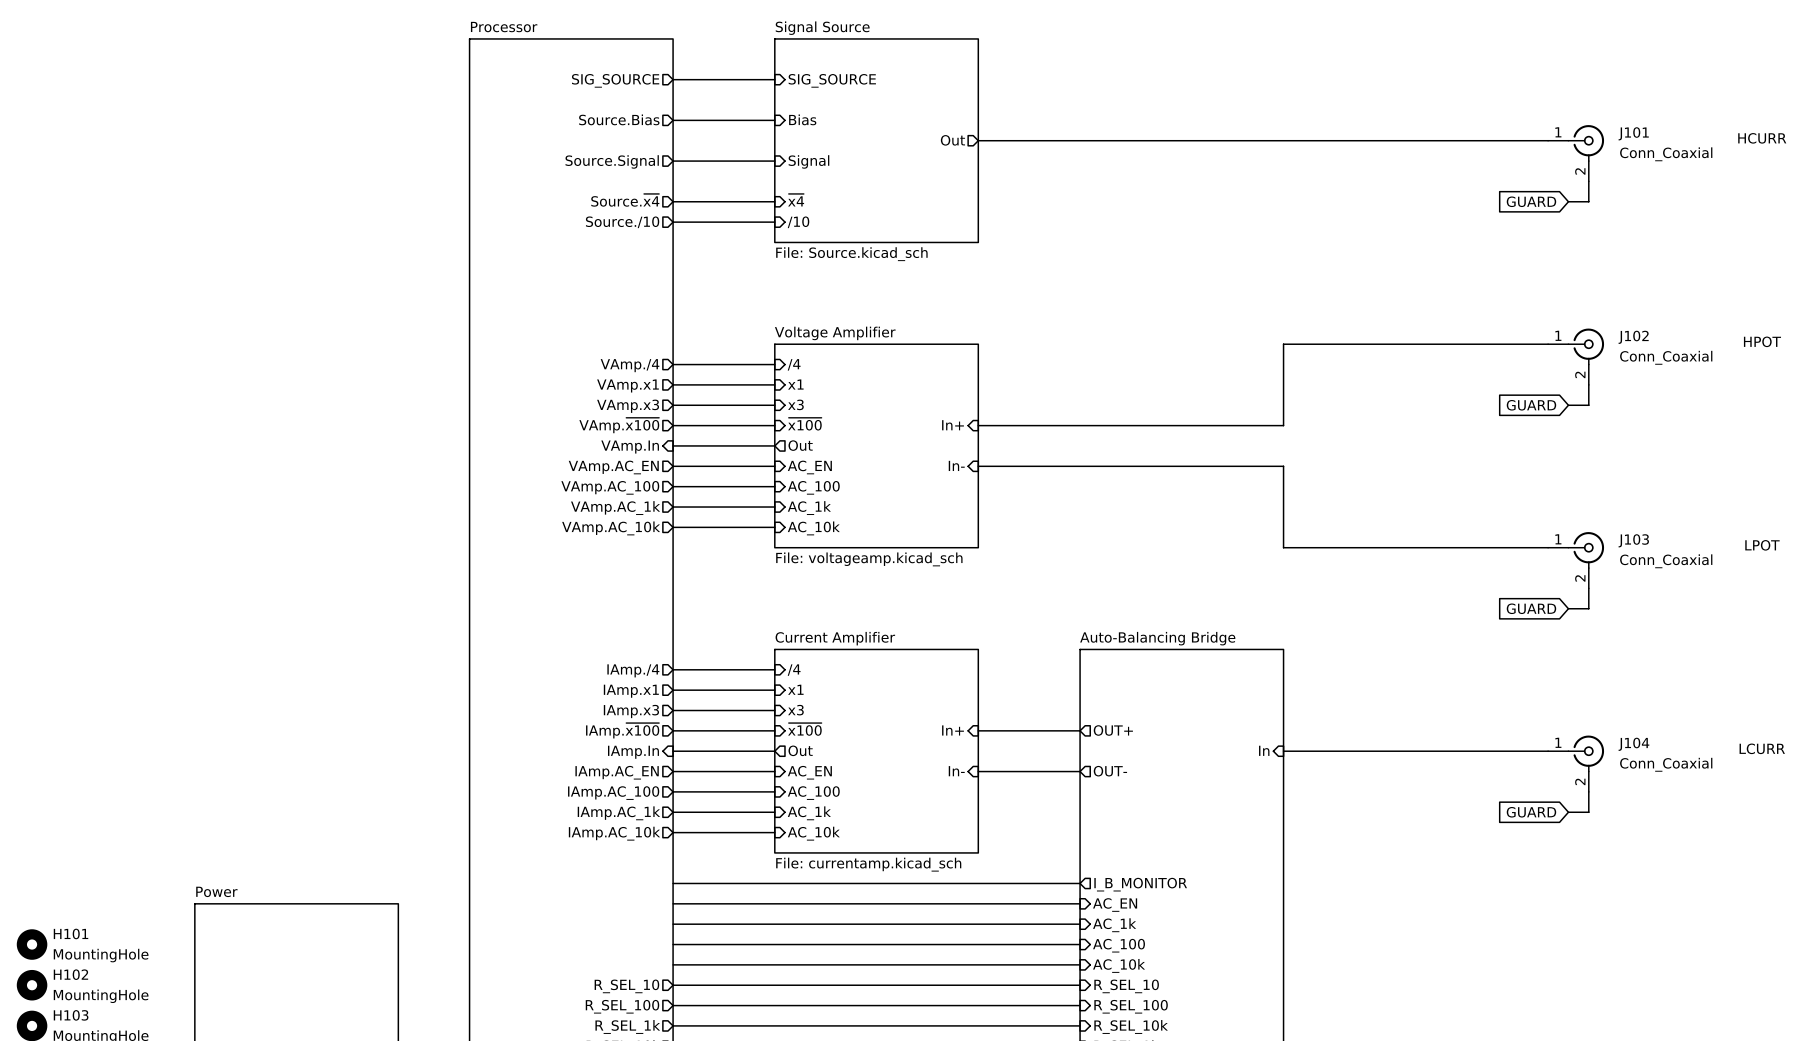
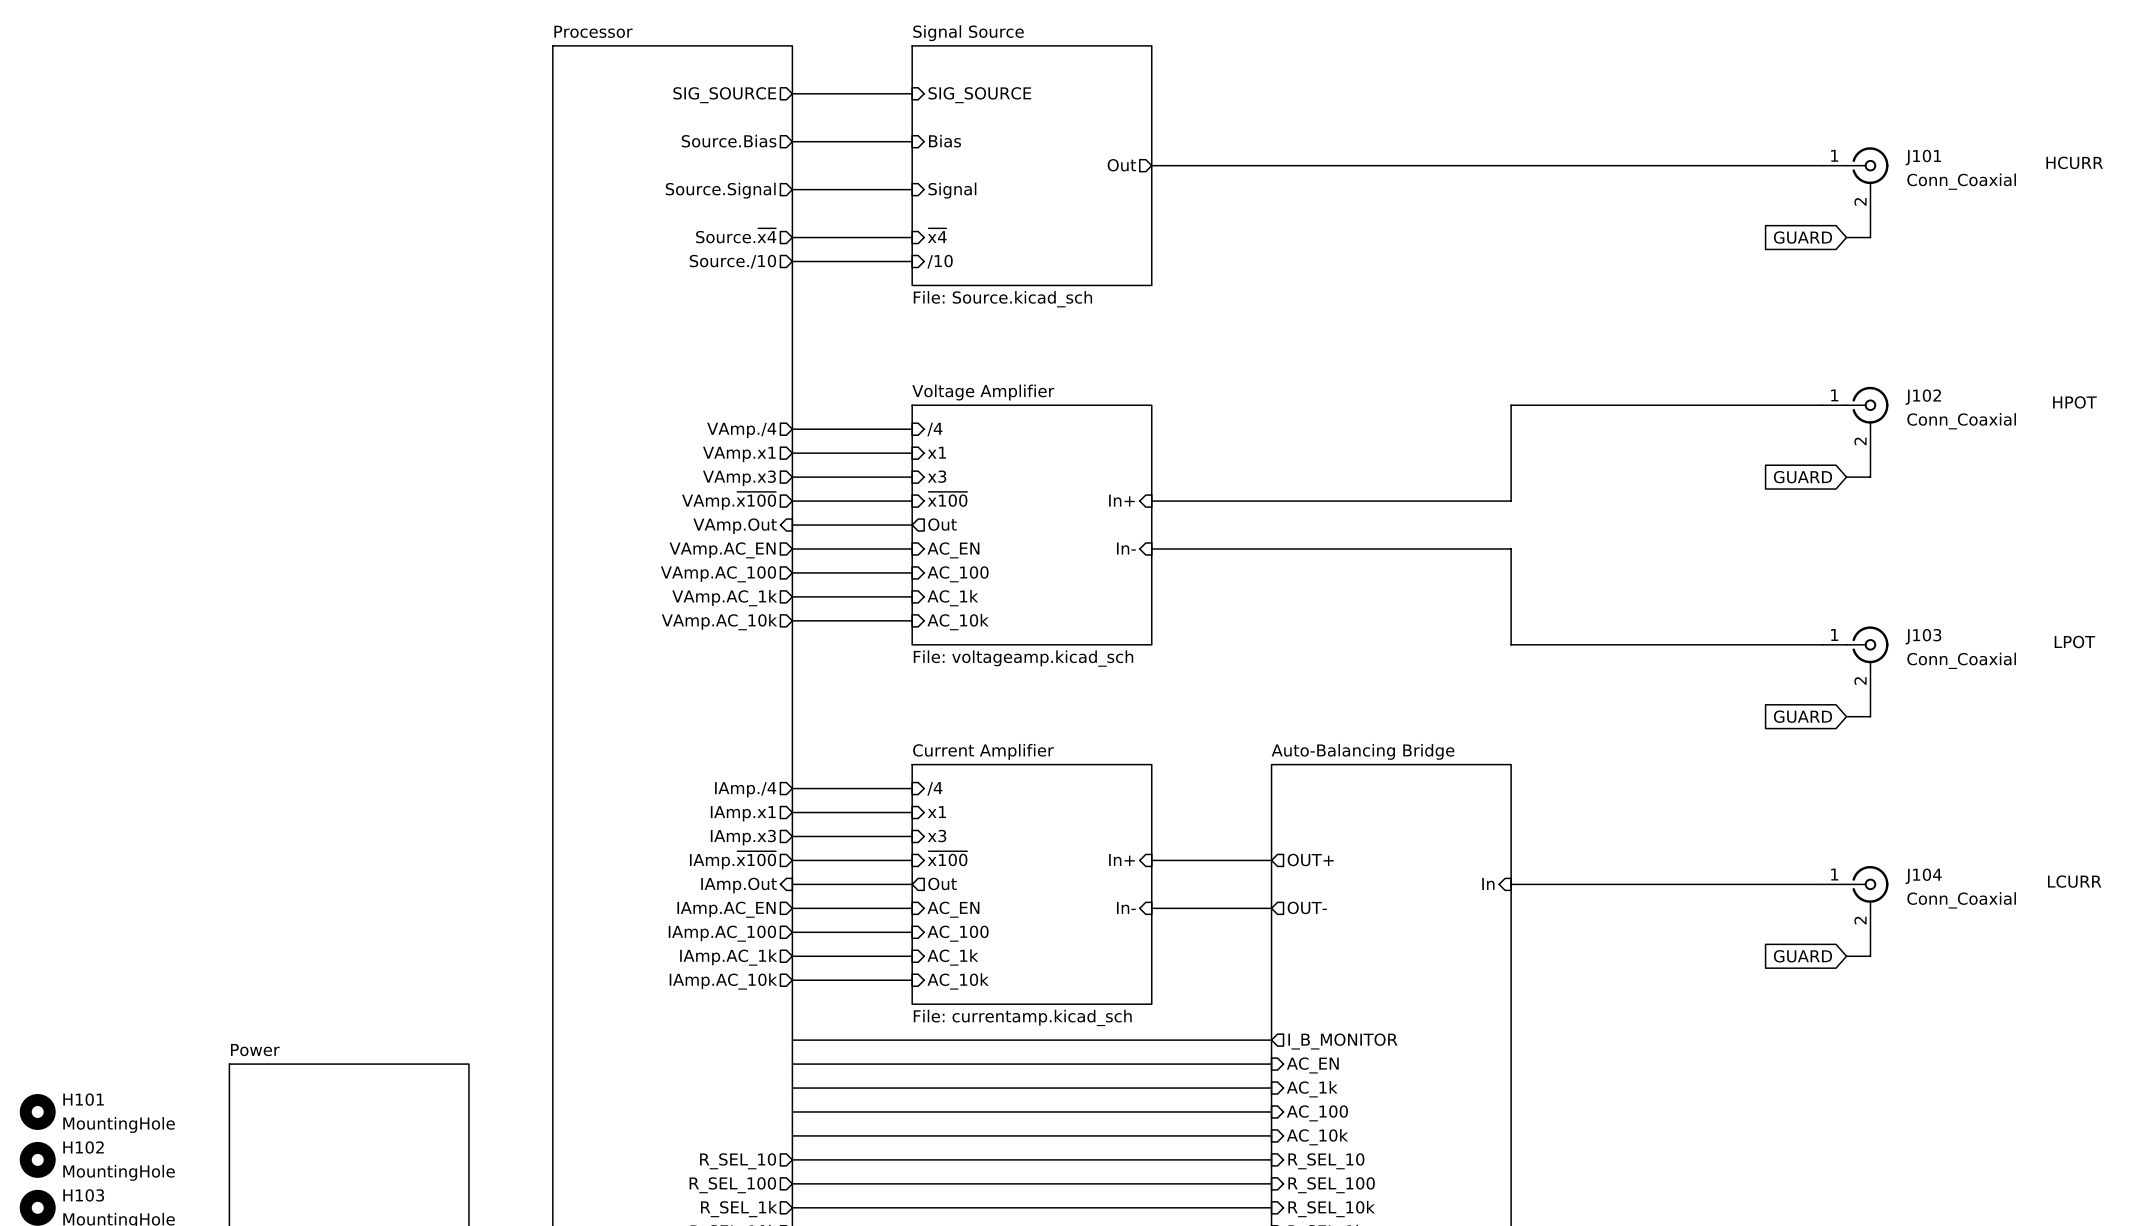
sheet pin: VAmp.In (630, 447) -> VAmp.Out (735, 526)
sheet pin: IAmp.In (633, 752) -> IAmp.Out (739, 885)

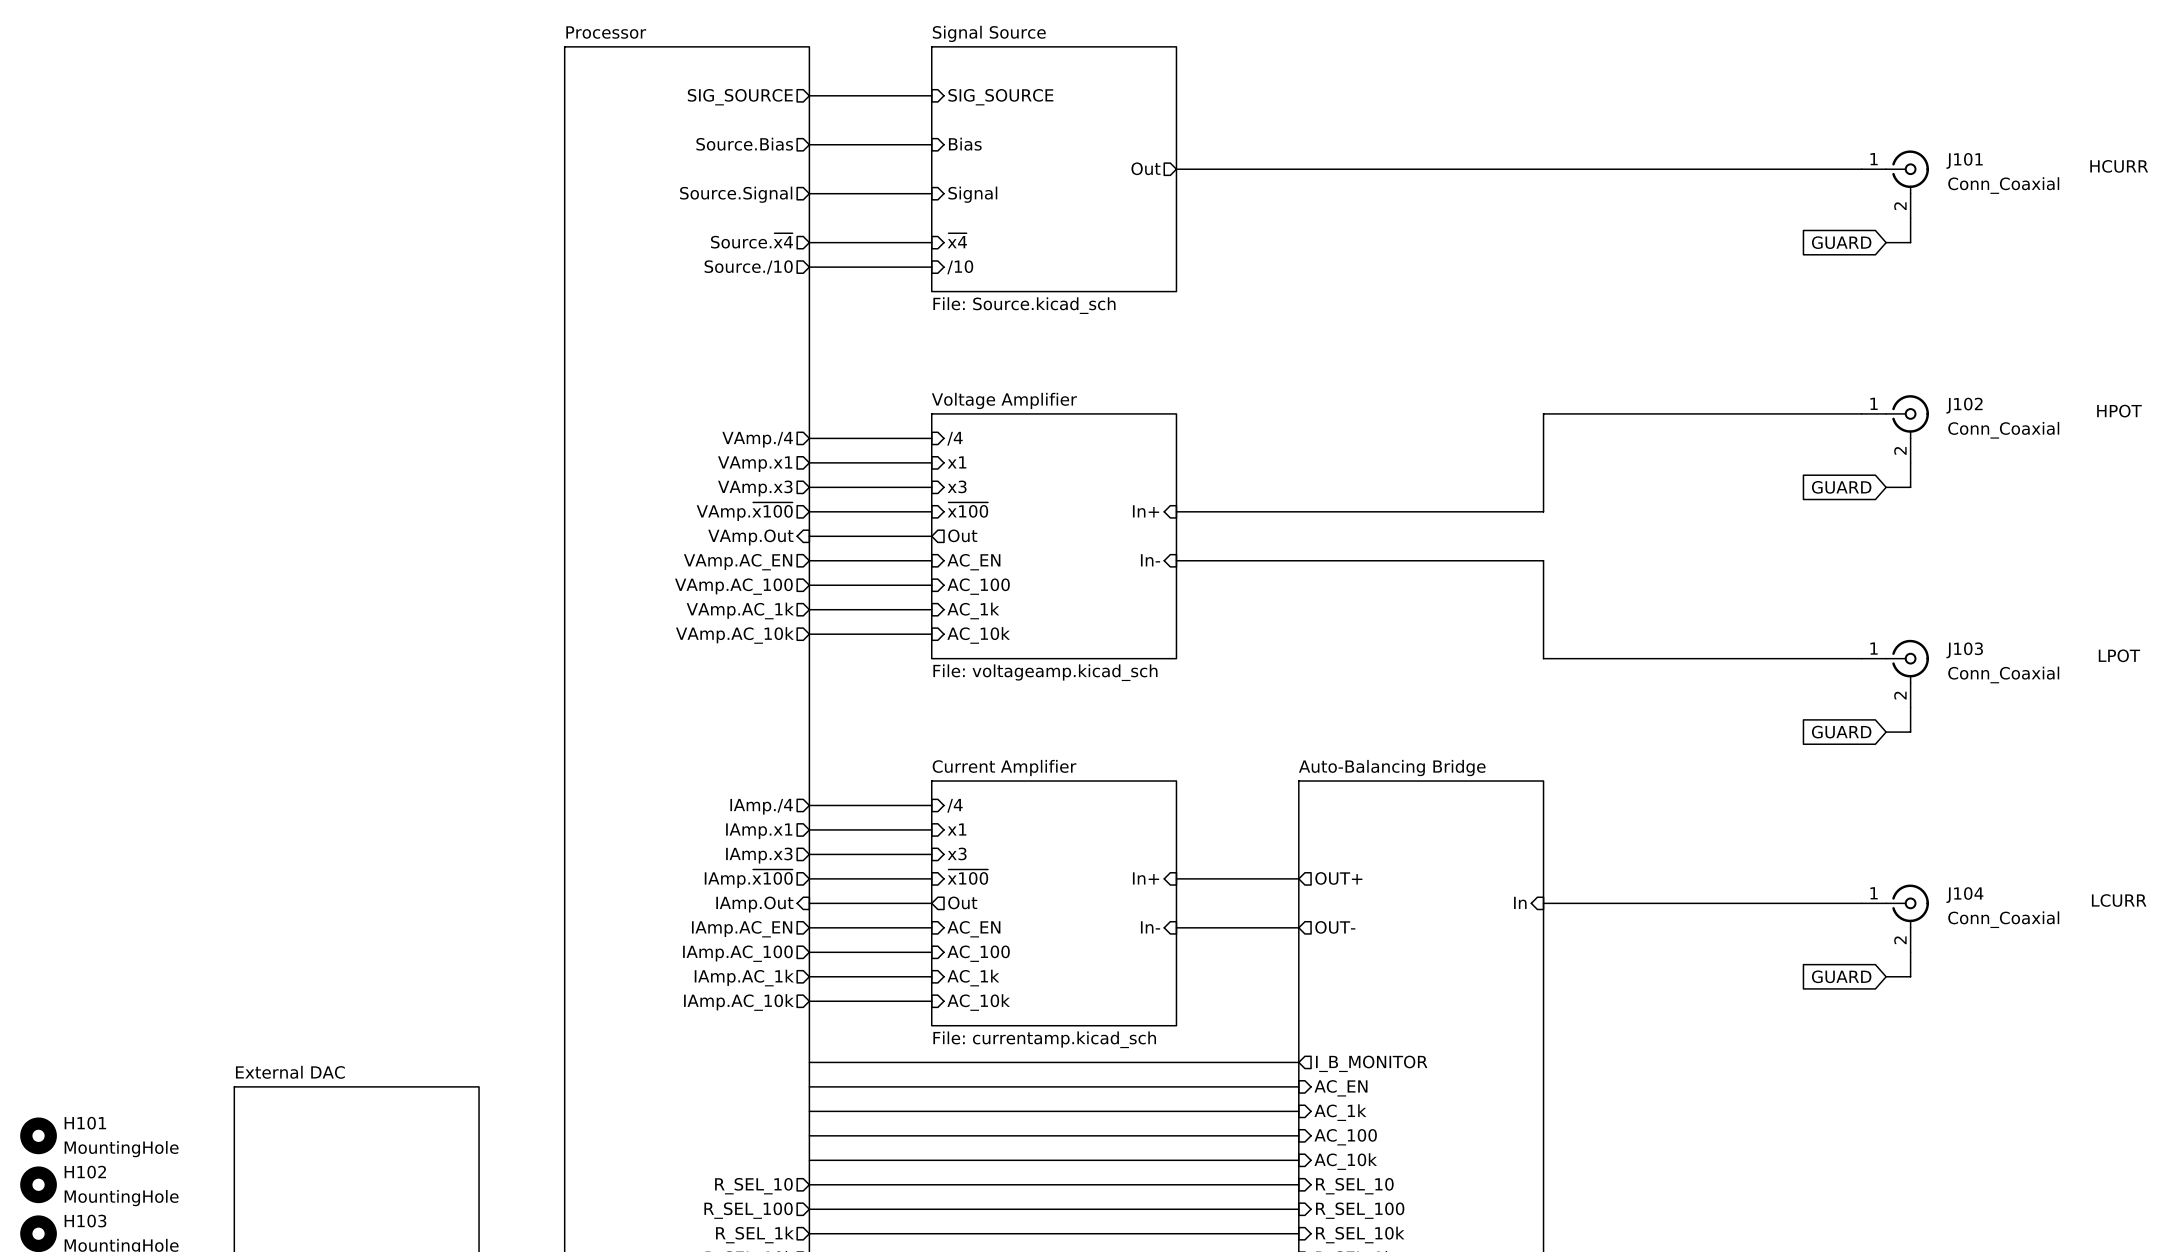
sheet Power name: Power (255, 1050) -> External DAC (290, 1072)

